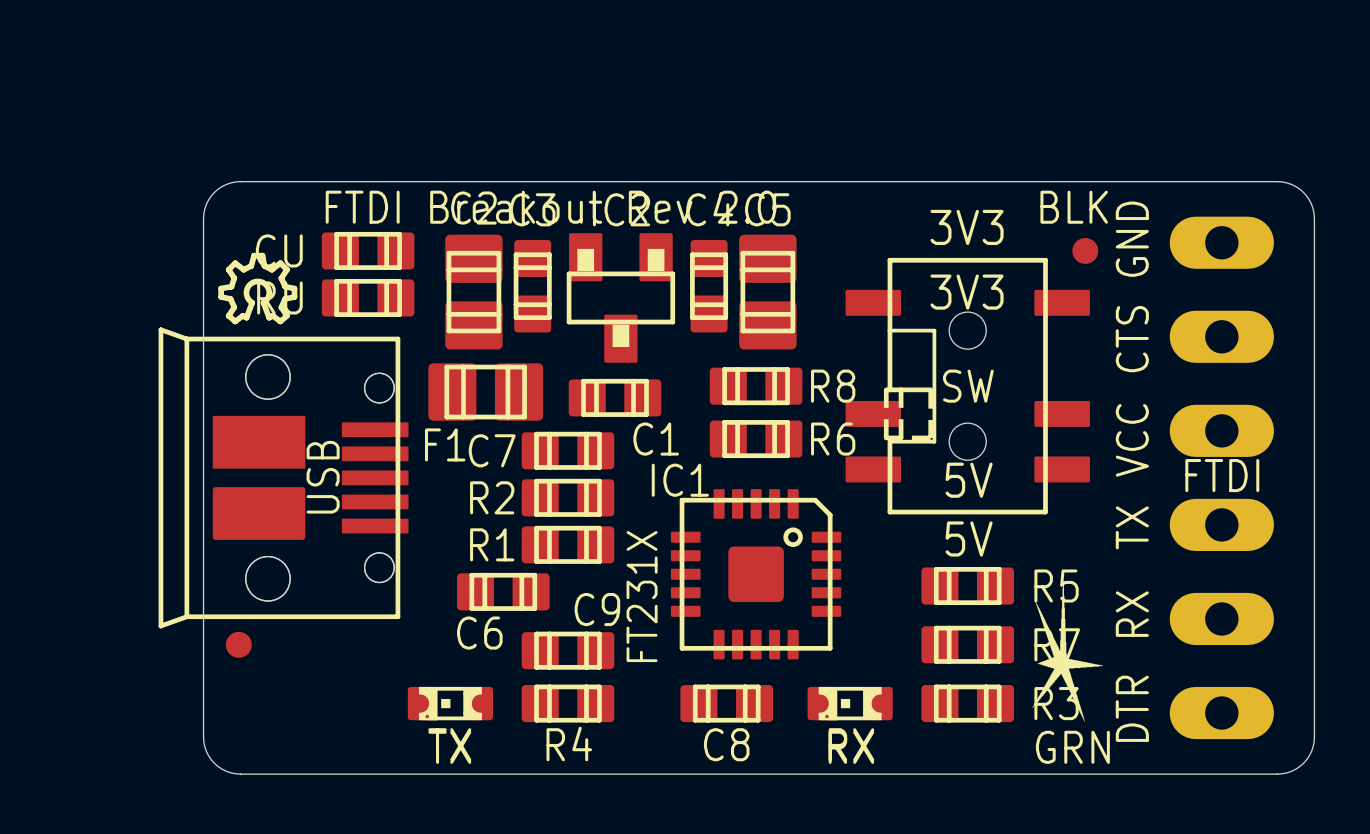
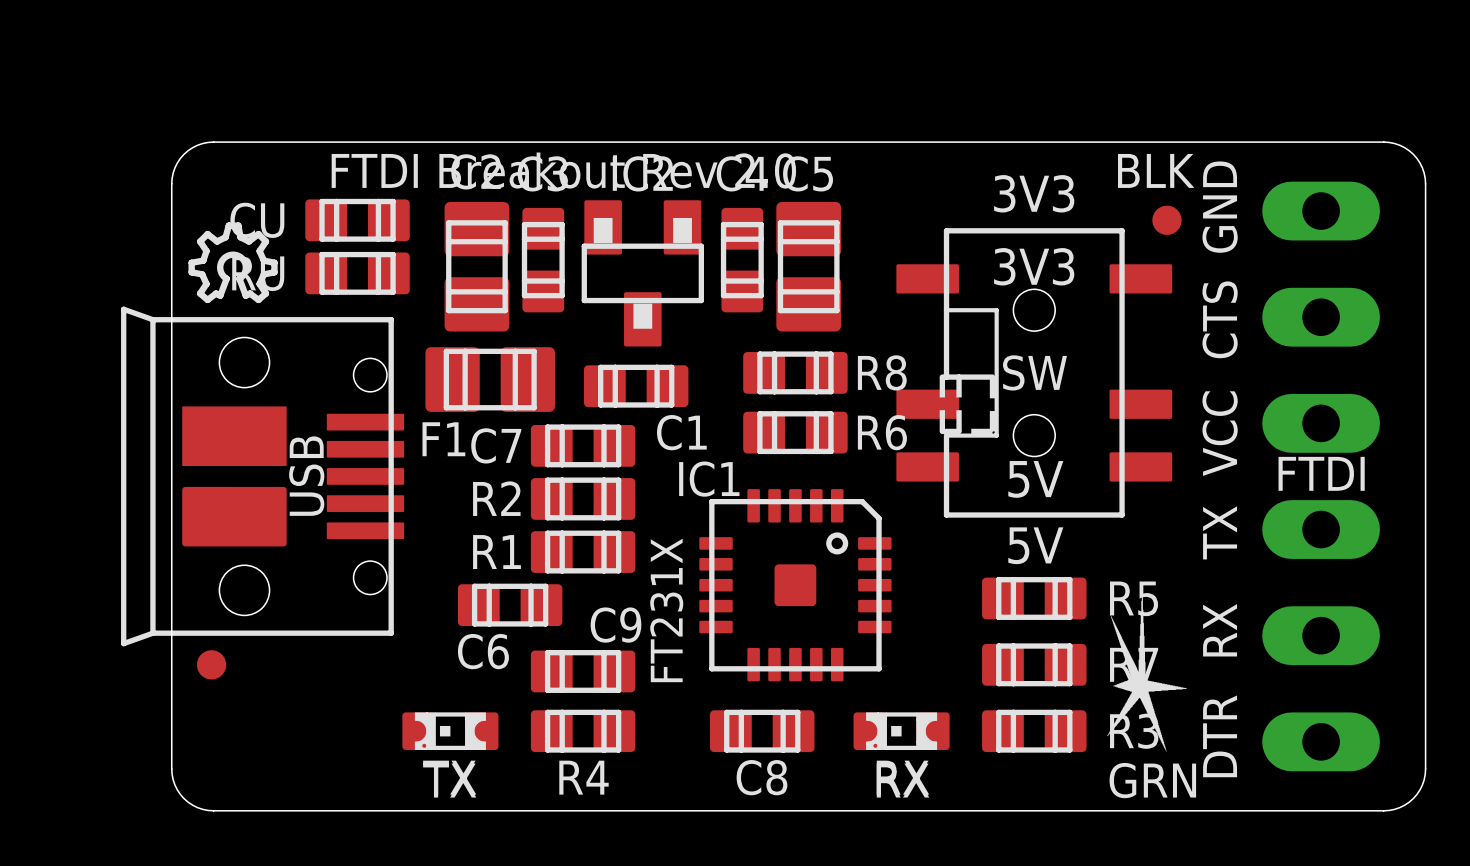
USB footprint: [158, 327, 409, 629] -> [121, 306, 405, 647]
IC1 footprint: [670, 489, 842, 660] -> [699, 489, 892, 682]

